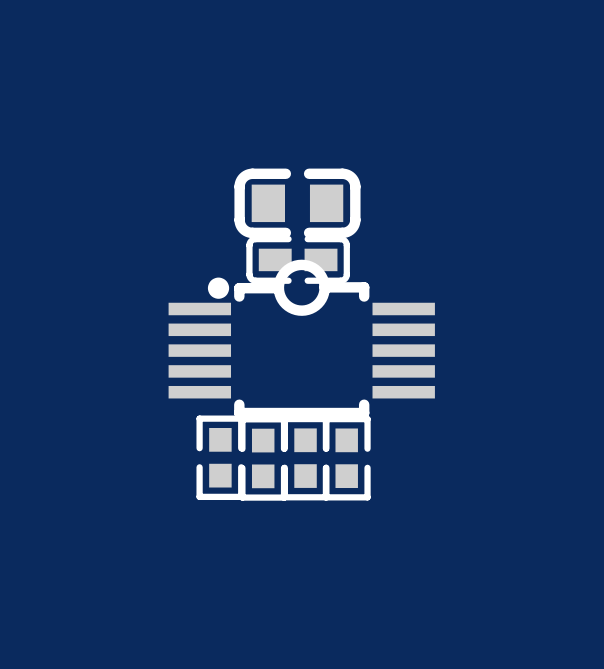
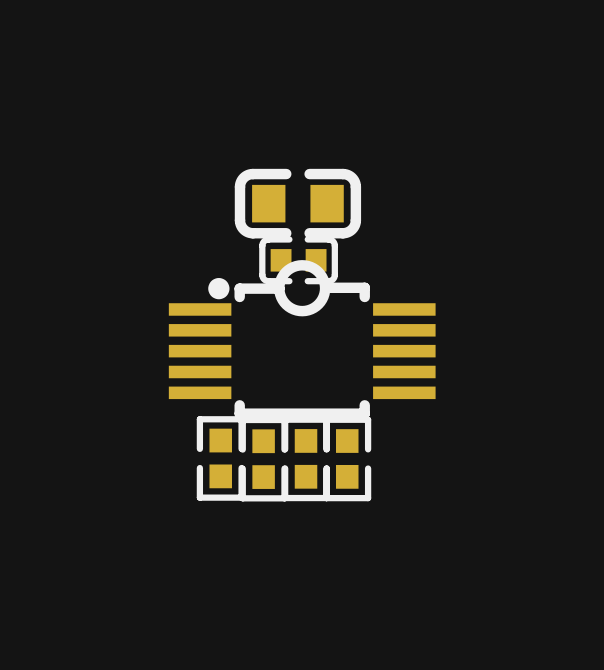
part footprint: [246, 236, 350, 284] -> [259, 236, 338, 285]

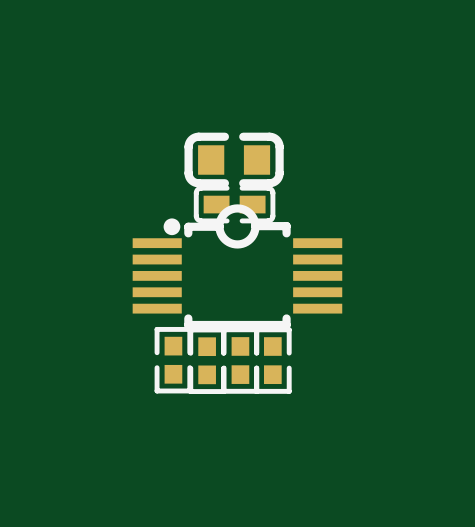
part footprint: [259, 236, 338, 285] -> [193, 185, 276, 224]

